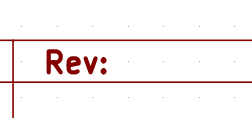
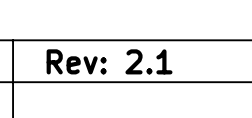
title block: Rev: (76, 61) -> Rev: 2.1 (109, 61)

